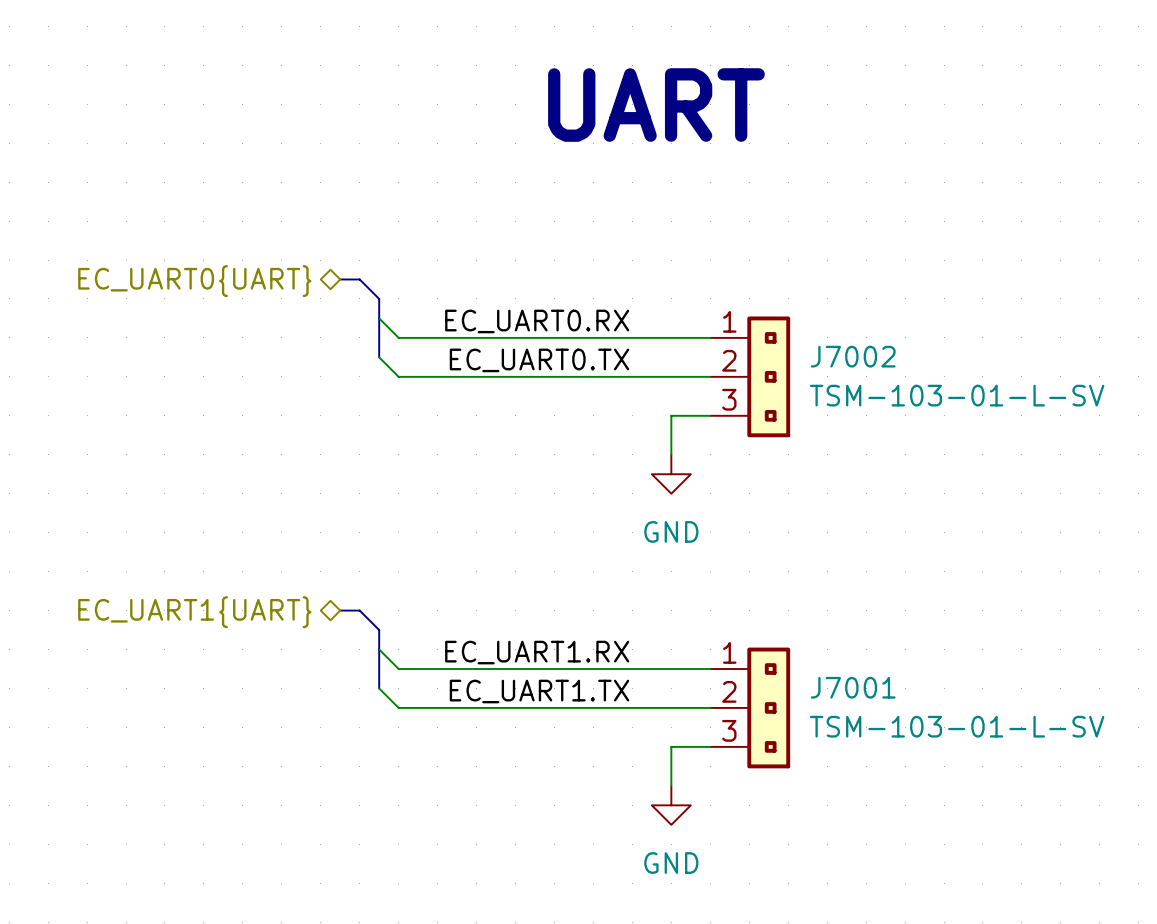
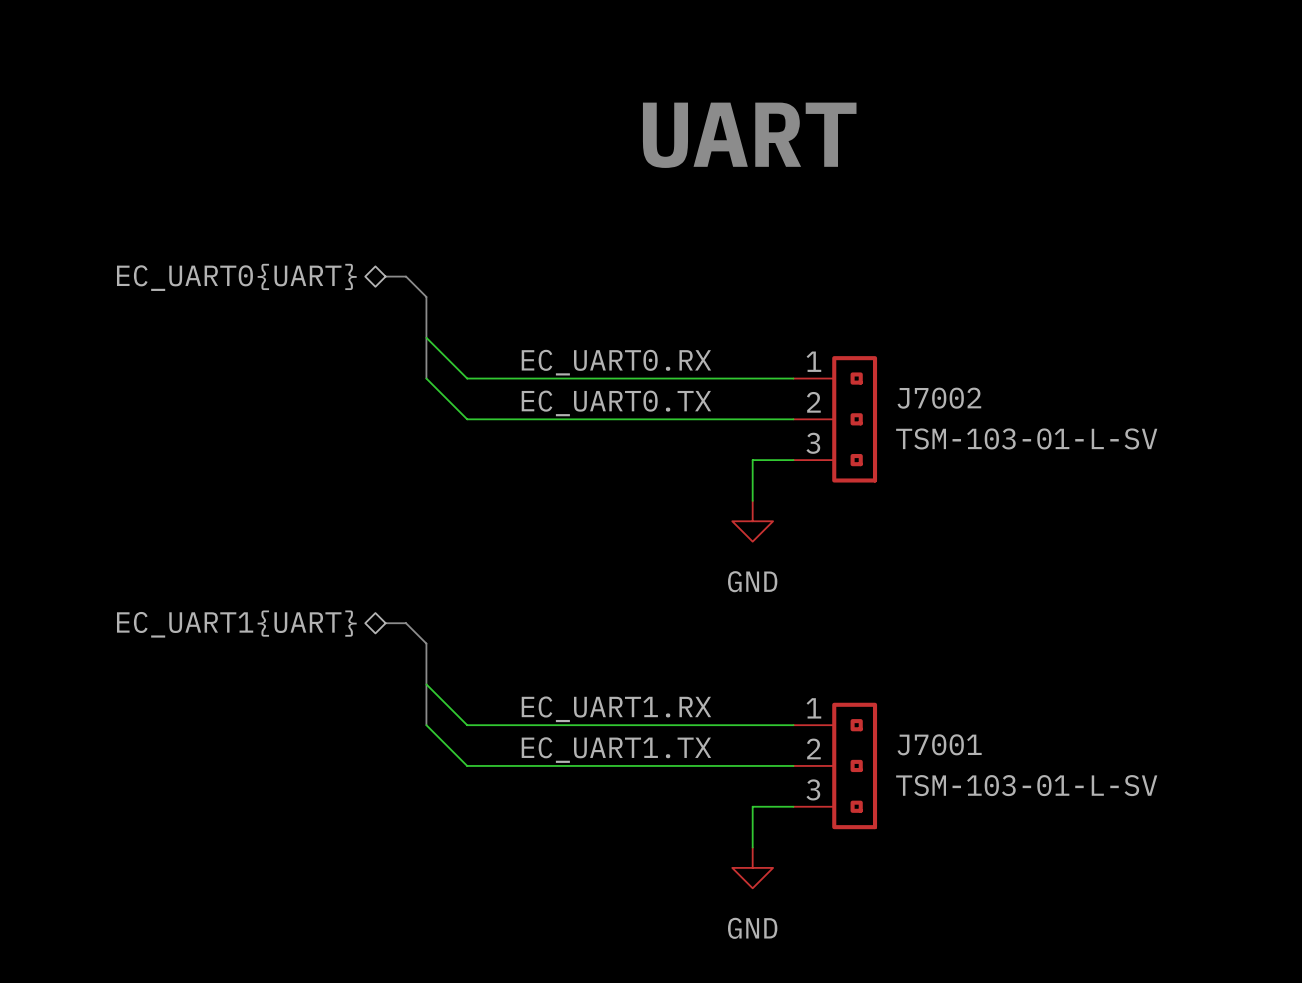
bus: none -> (385, 276) (406, 276) (426, 296) (426, 378)
bus: (340, 279) (359, 279) (379, 298) (379, 357) -> none
hierarchical label position: EC_UART0{UART} (194, 281) -> EC_UART0{UART} (236, 277)
wire: none -> (426, 337) (446, 358)
wire: none -> (426, 378) (446, 398)
bus: none -> (385, 623) (406, 623) (426, 643) (426, 725)
bus: (340, 610) (359, 610) (379, 630) (379, 688) -> none
hierarchical label position: EC_UART1{UART} (194, 612) -> EC_UART1{UART} (236, 624)
wire: none -> (426, 684) (446, 704)
wire: none -> (426, 725) (446, 745)

